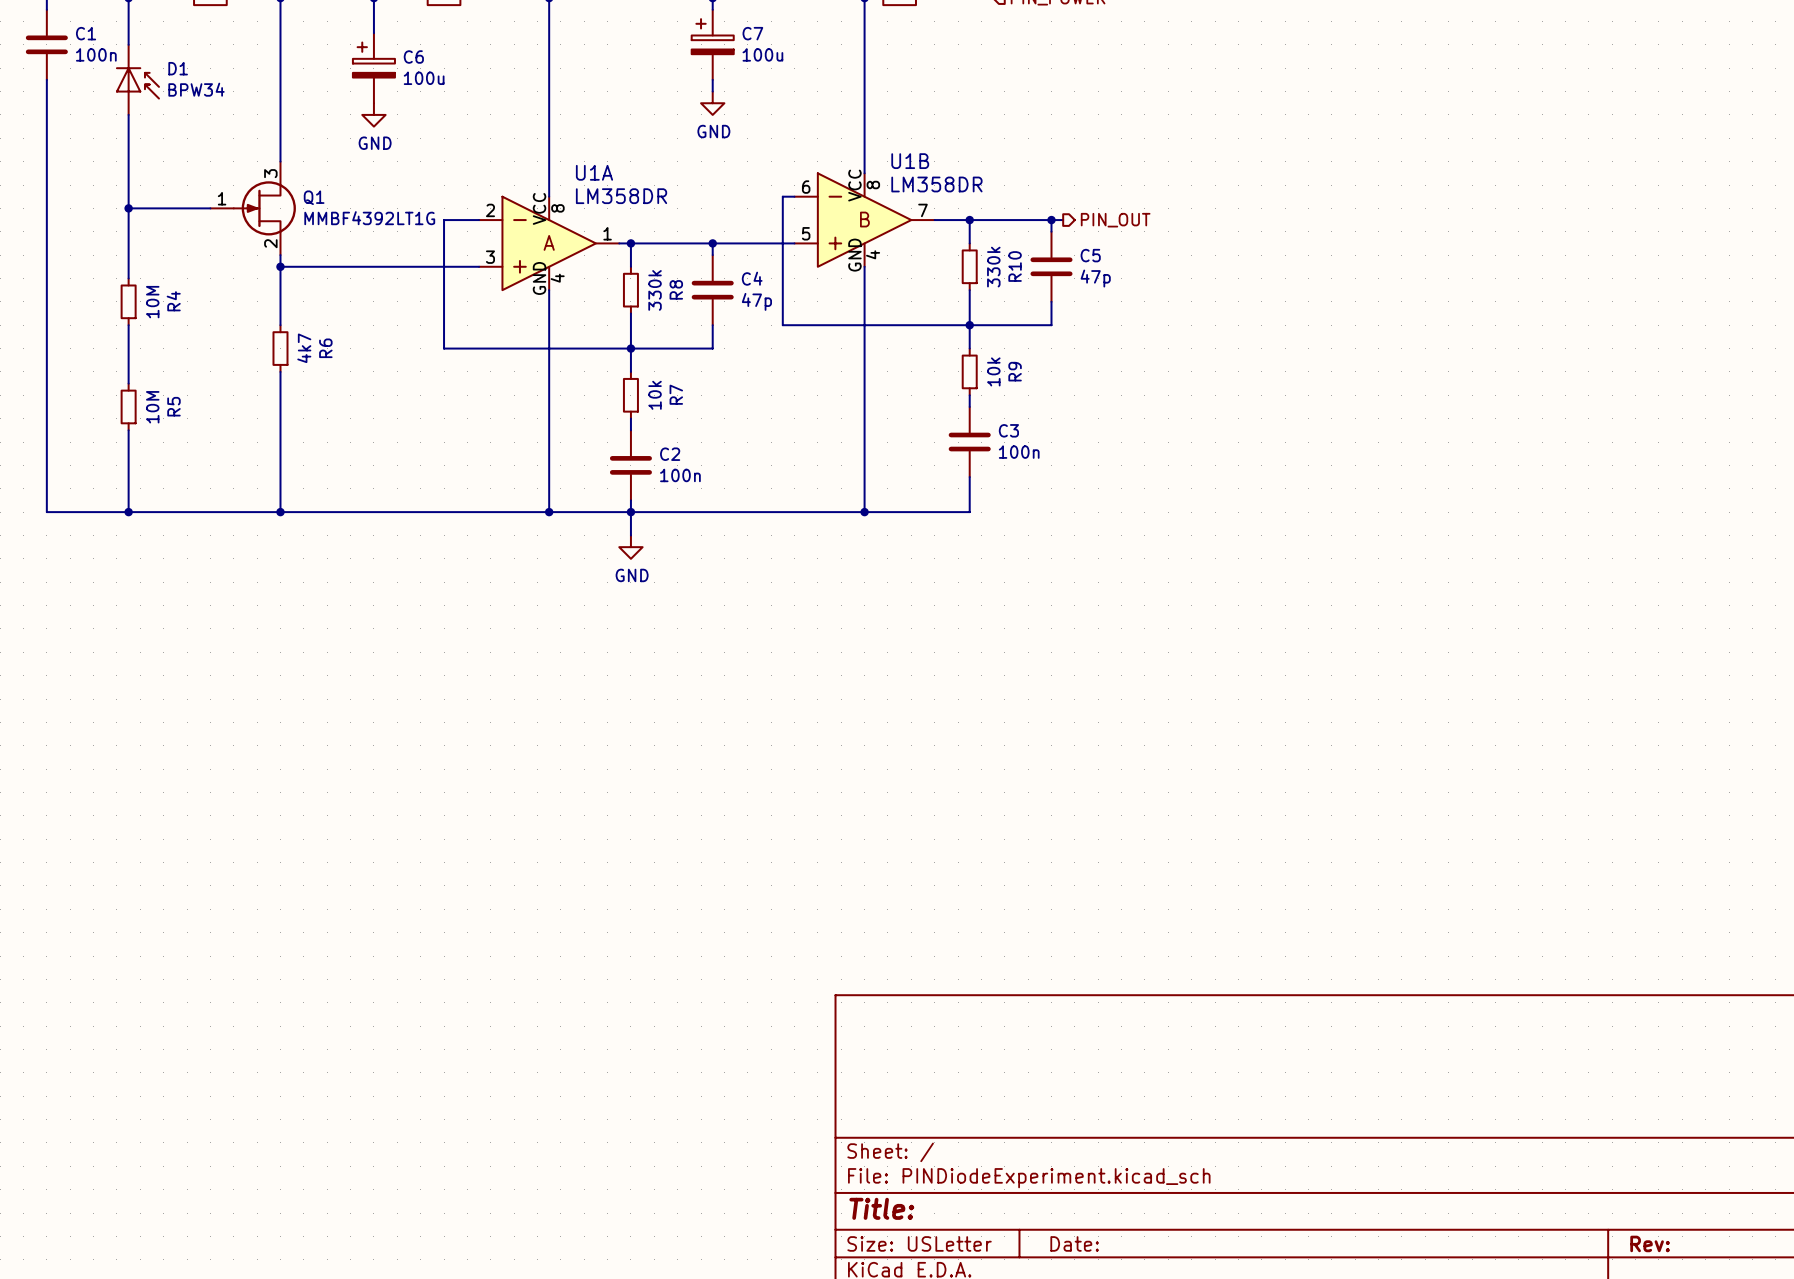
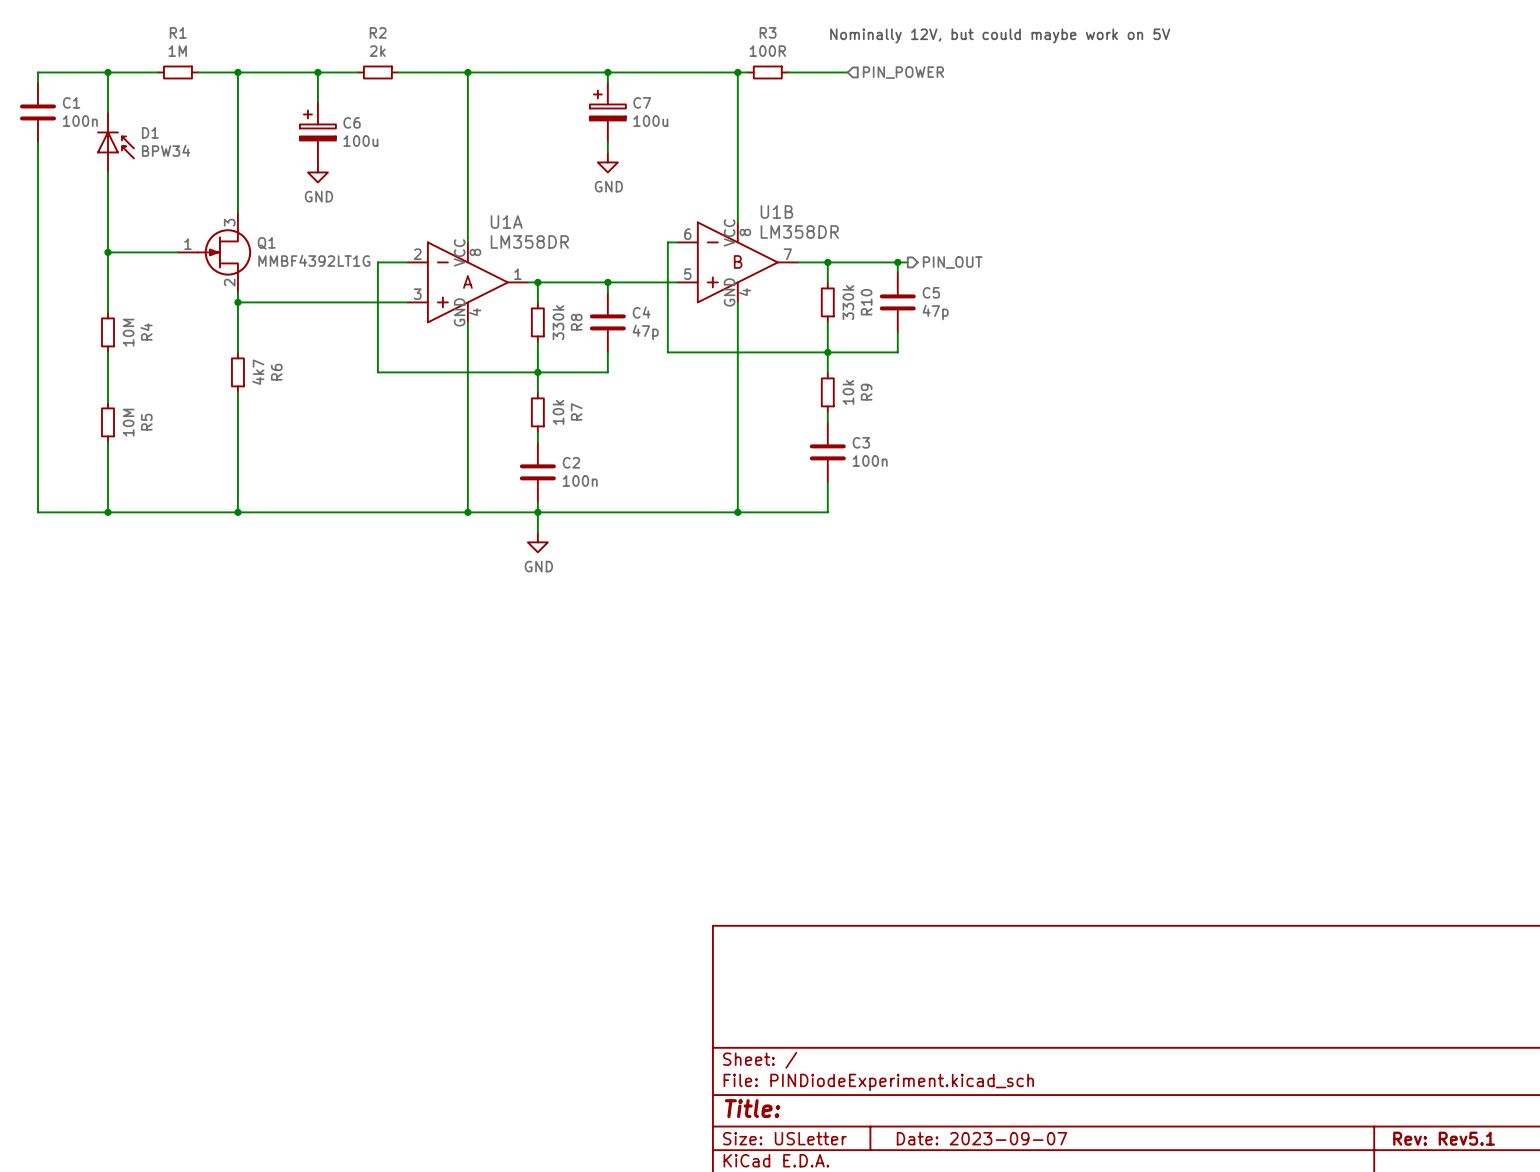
title block: Date: (1074, 1243) -> Date: 2023-09-07 (981, 1138)
title block: Rev: (1650, 1243) -> Rev: Rev5.1 (1444, 1138)

